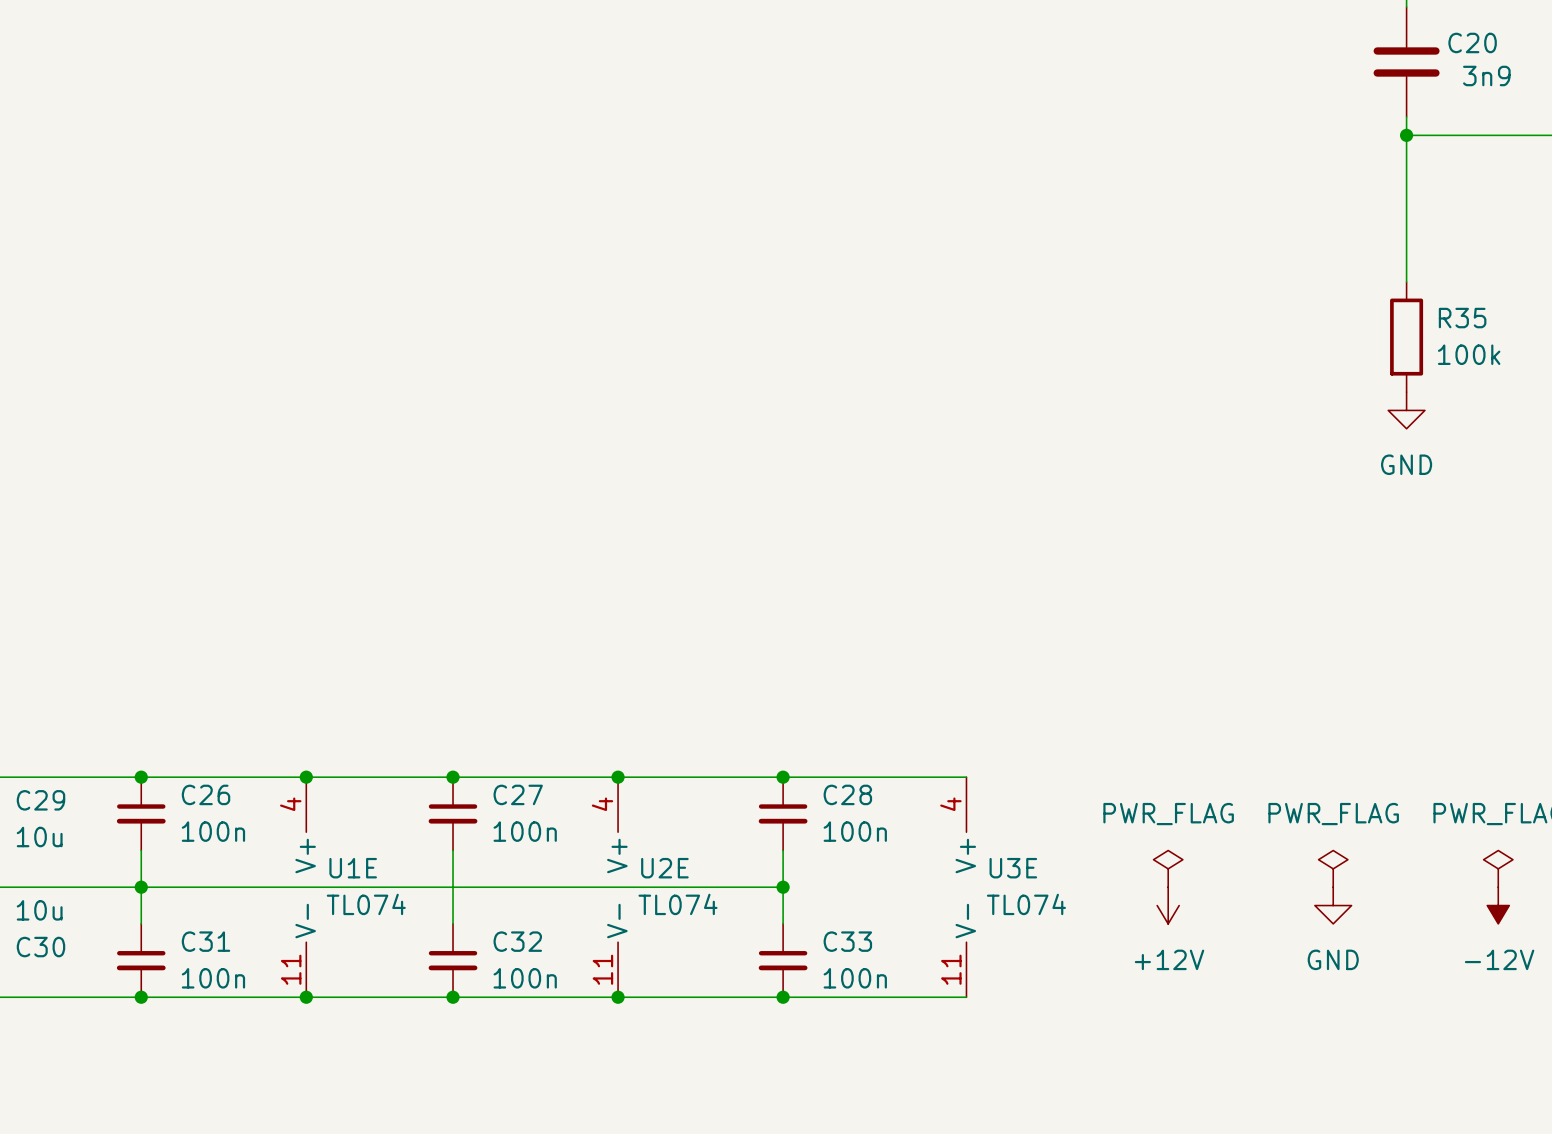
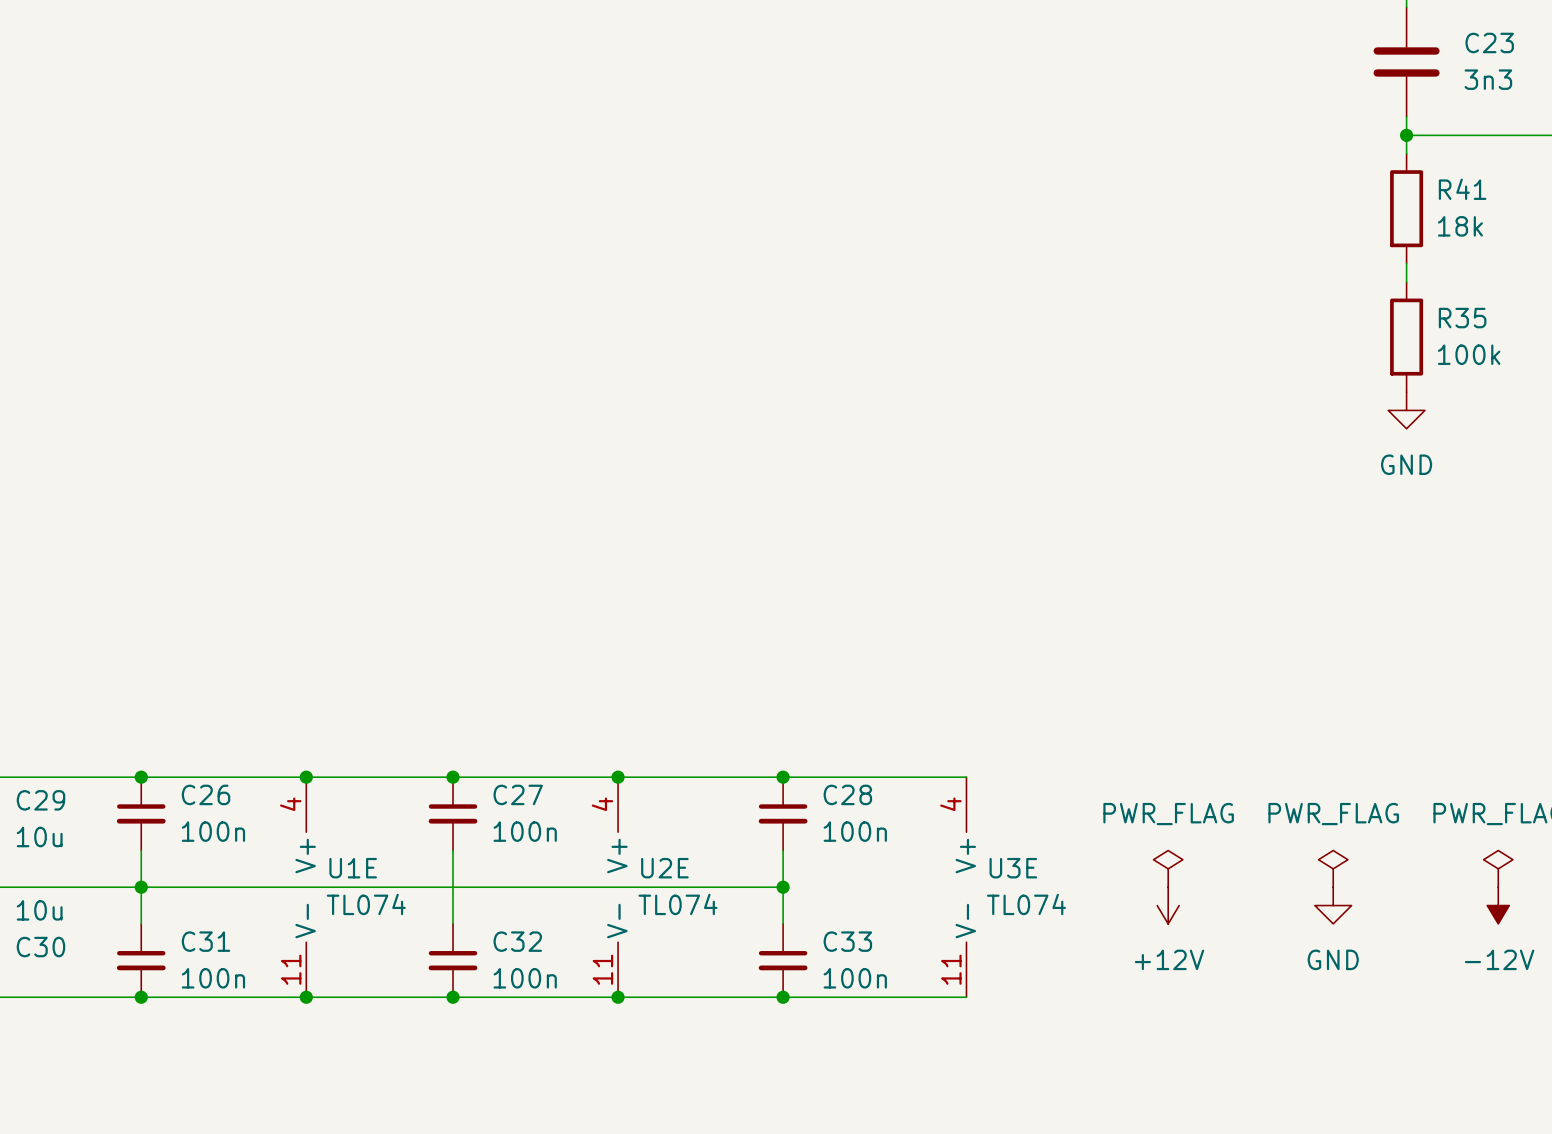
C20 name: C20 (1472, 42) -> C23 (1489, 42)
C20 value: 3n9 (1486, 75) -> 3n3 (1488, 79)
wire: (1406, 153) (1406, 263) -> none
R41: none -> 18k (1406, 208)

